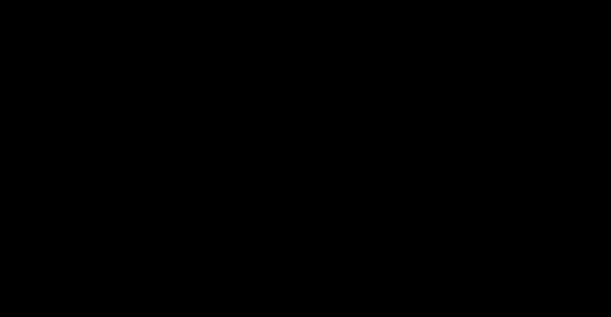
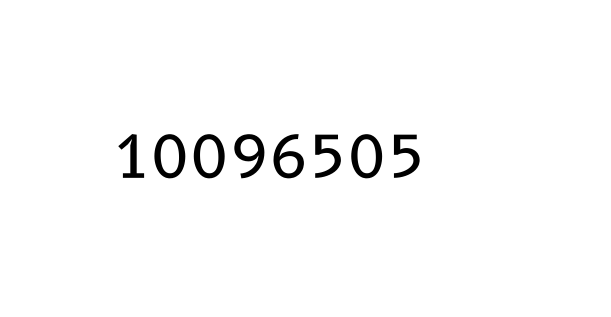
text: none -> 10096505 (268, 156)

